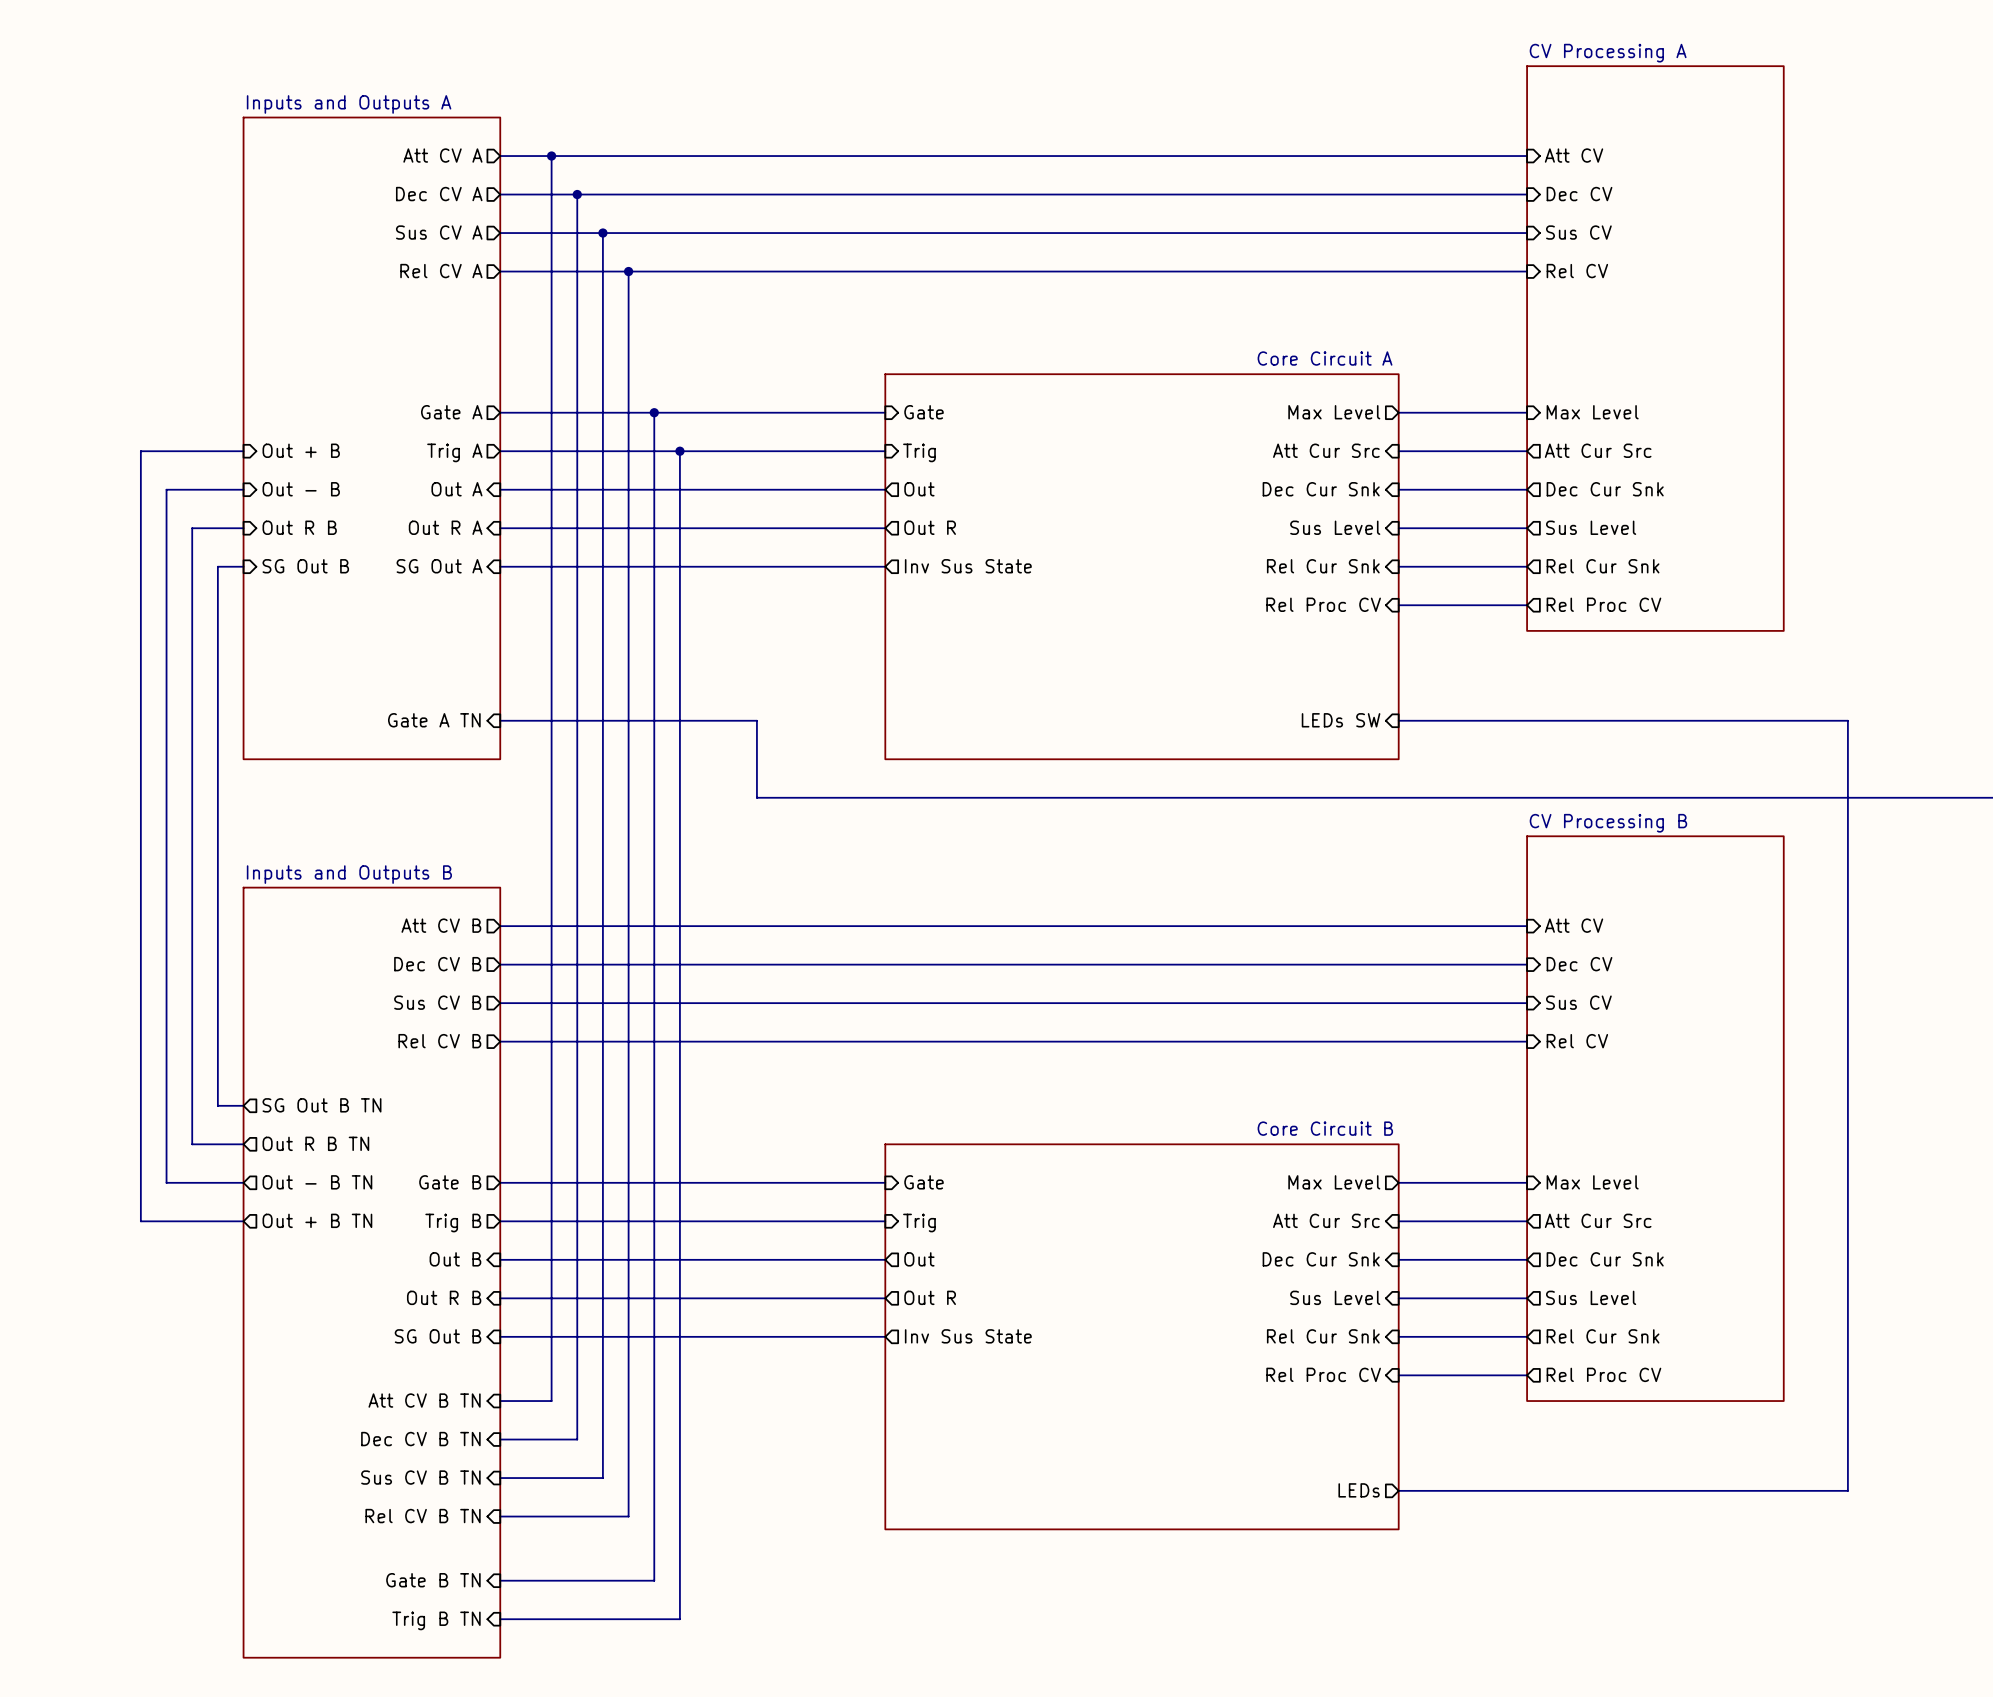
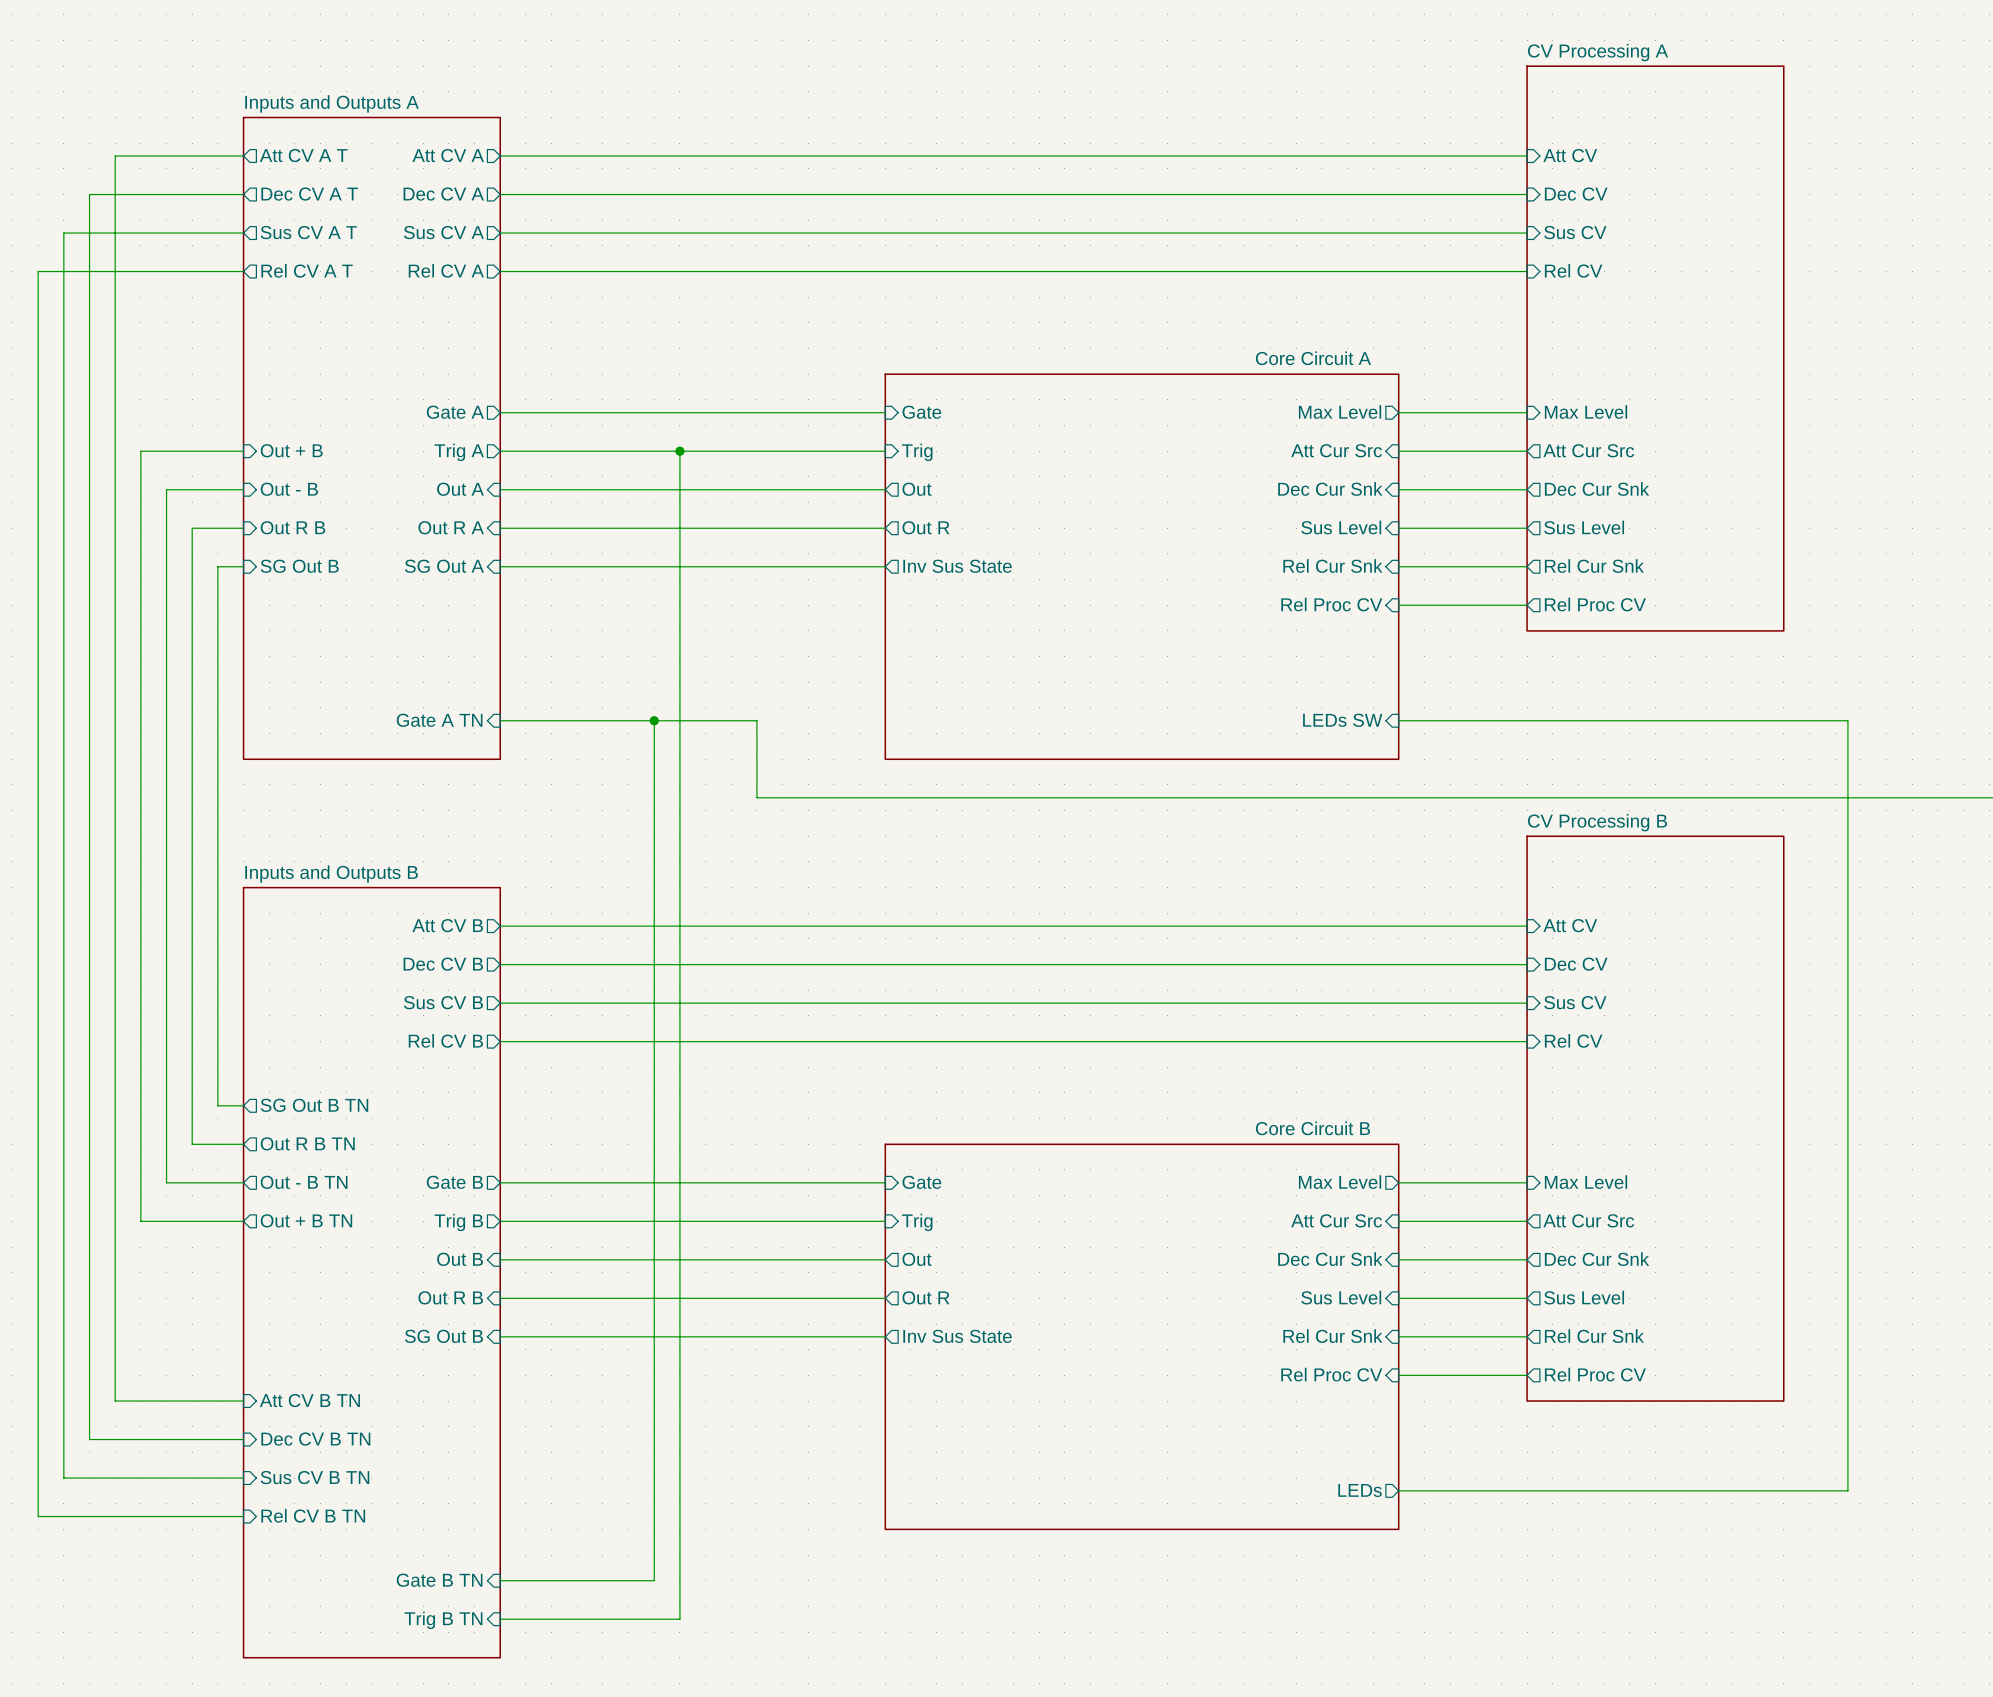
sheet pin: none -> Att CV A T (303, 155)
wire: none -> (243, 156) (115, 156) (115, 1401) (243, 1401)
wire: (551, 156) (551, 1401) (500, 1401) -> none
junction: (551, 156) -> none
wire: none -> (243, 194) (89, 194) (89, 1439) (243, 1439)
sheet pin: none -> Dec CV A T (309, 194)
wire: (577, 194) (577, 1439) (500, 1439) -> none
junction: (577, 194) -> none
sheet pin: none -> Sus CV A T (308, 232)
wire: none -> (243, 233) (63, 233) (63, 1478) (243, 1478)
wire: (602, 233) (602, 1478) (500, 1478) -> none
junction: (602, 233) -> none
wire: none -> (243, 271) (38, 271) (38, 1516) (243, 1516)
sheet pin: none -> Rel CV A T (307, 270)
wire: (628, 271) (628, 1516) (500, 1516) -> none
junction: (628, 271) -> none
wire: (654, 412) (654, 720) -> none
junction: (654, 412) -> none
junction: none -> (654, 720)
sheet pin rotation: 0° (424, 1400) -> 180° (309, 1400)
sheet pin rotation: 0° (420, 1439) -> 180° (315, 1439)
sheet pin rotation: 0° (420, 1477) -> 180° (314, 1477)
sheet pin rotation: 0° (423, 1516) -> 180° (313, 1515)

